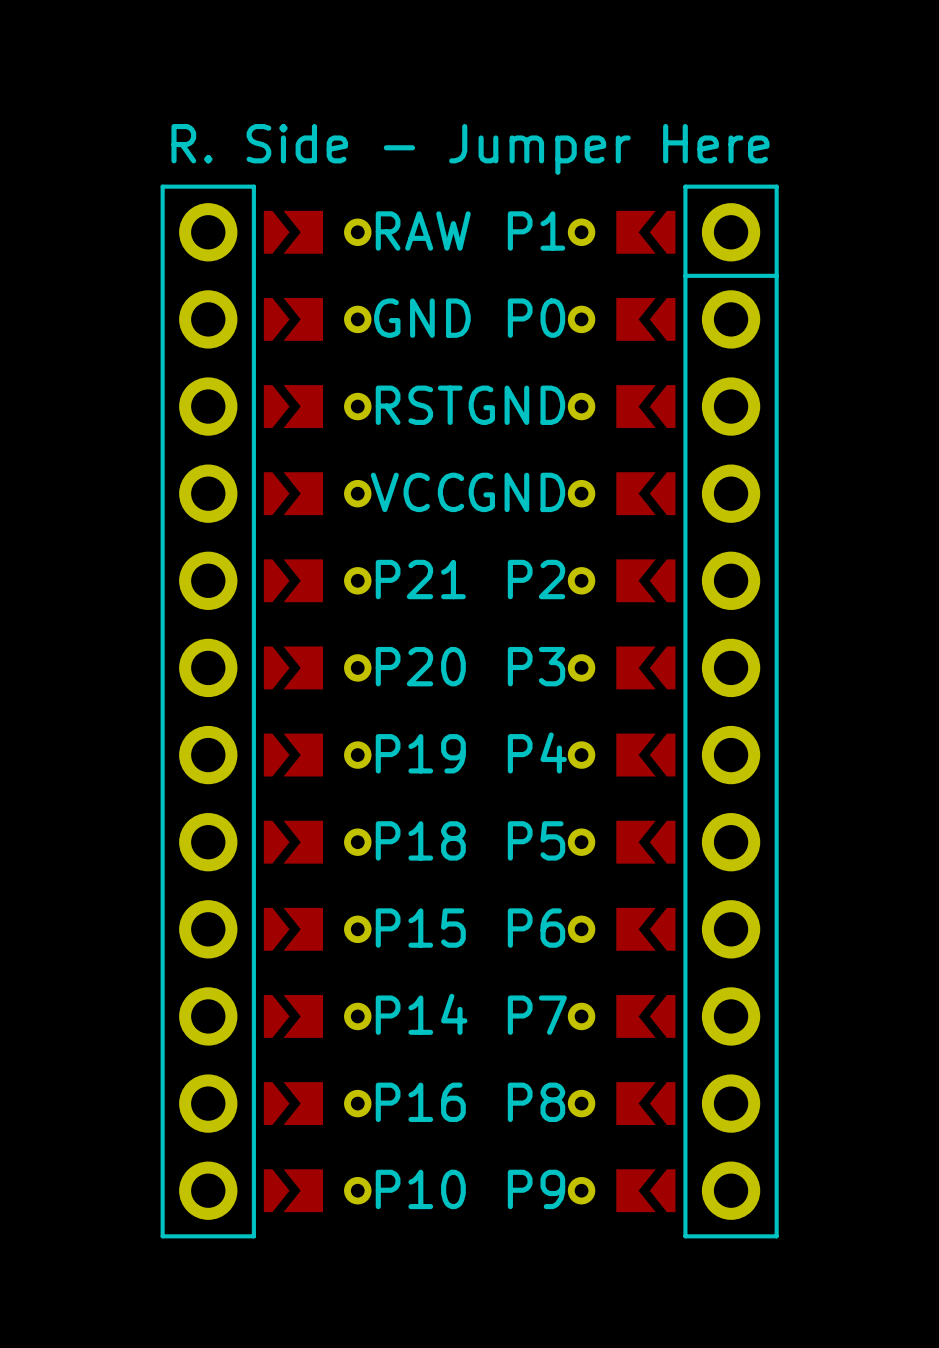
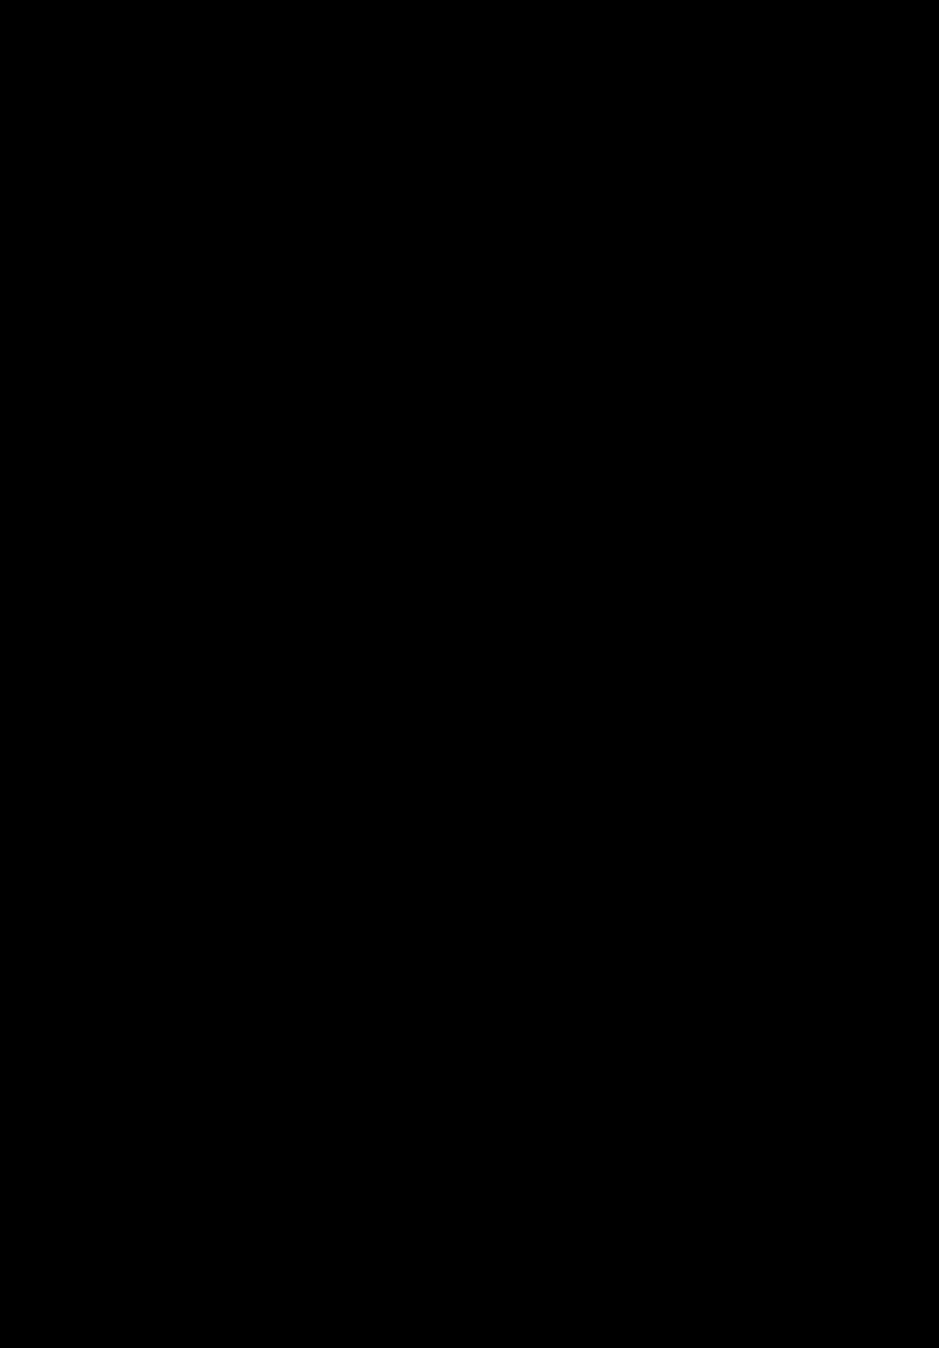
part: (469, 711) -> none

